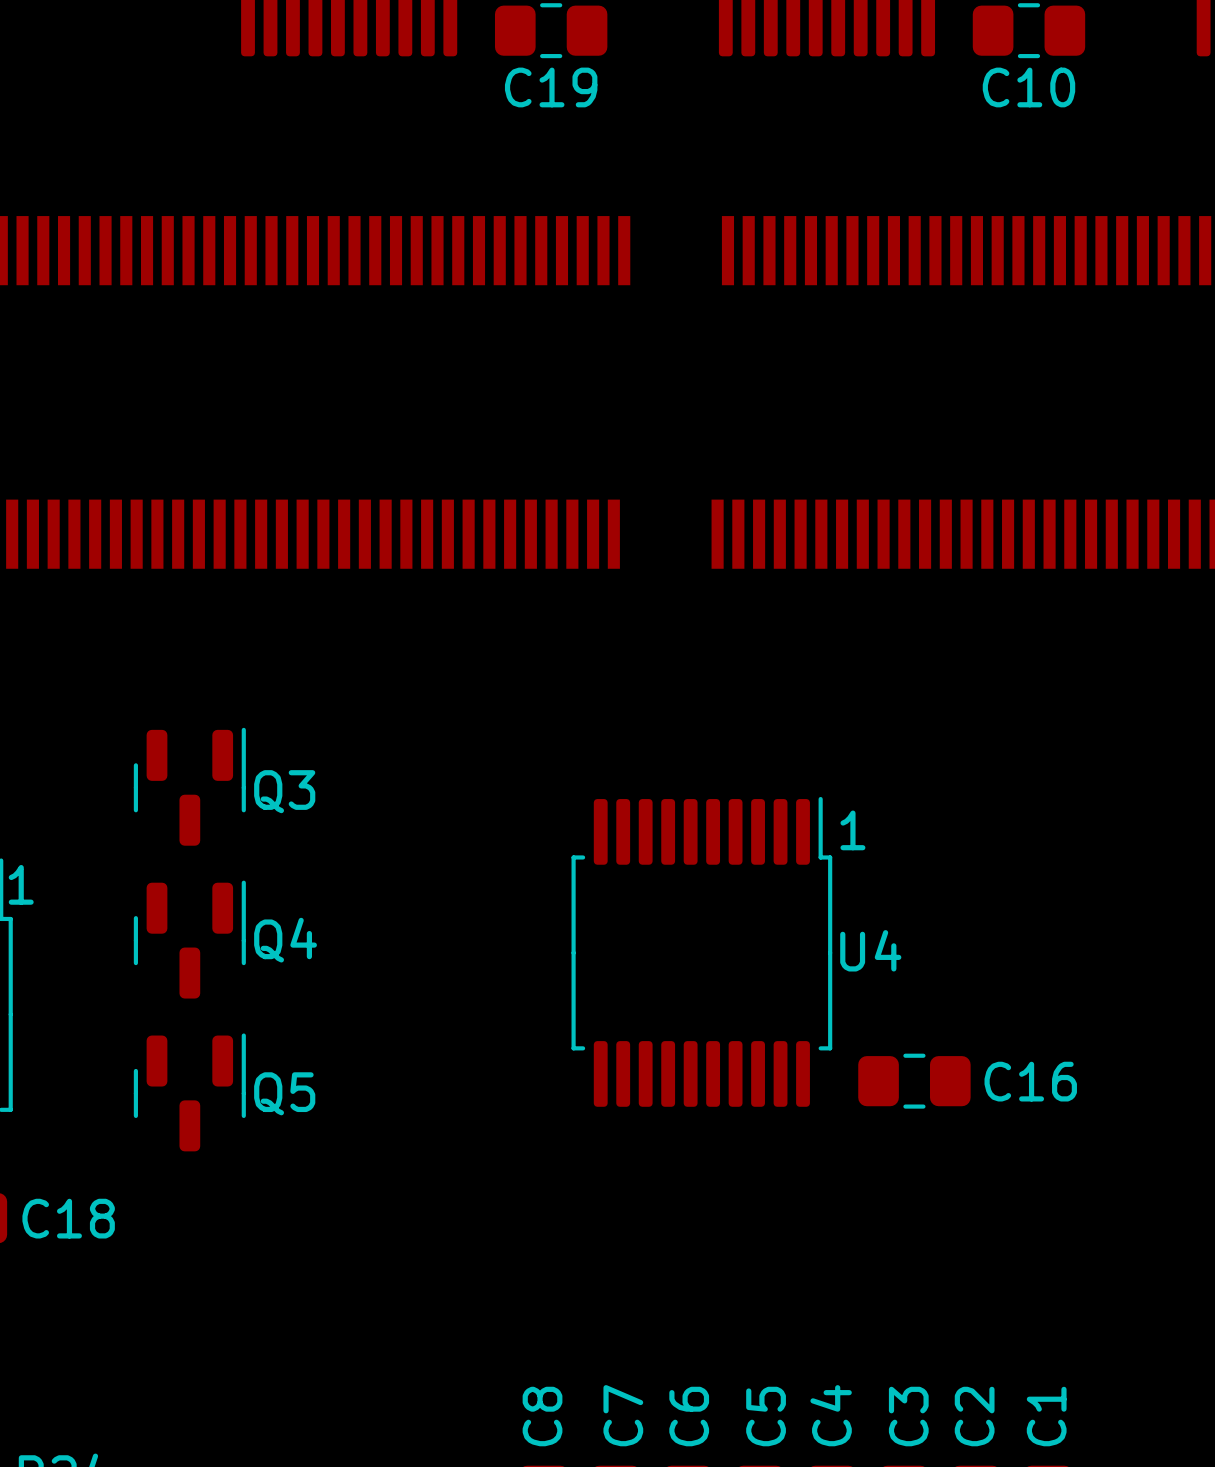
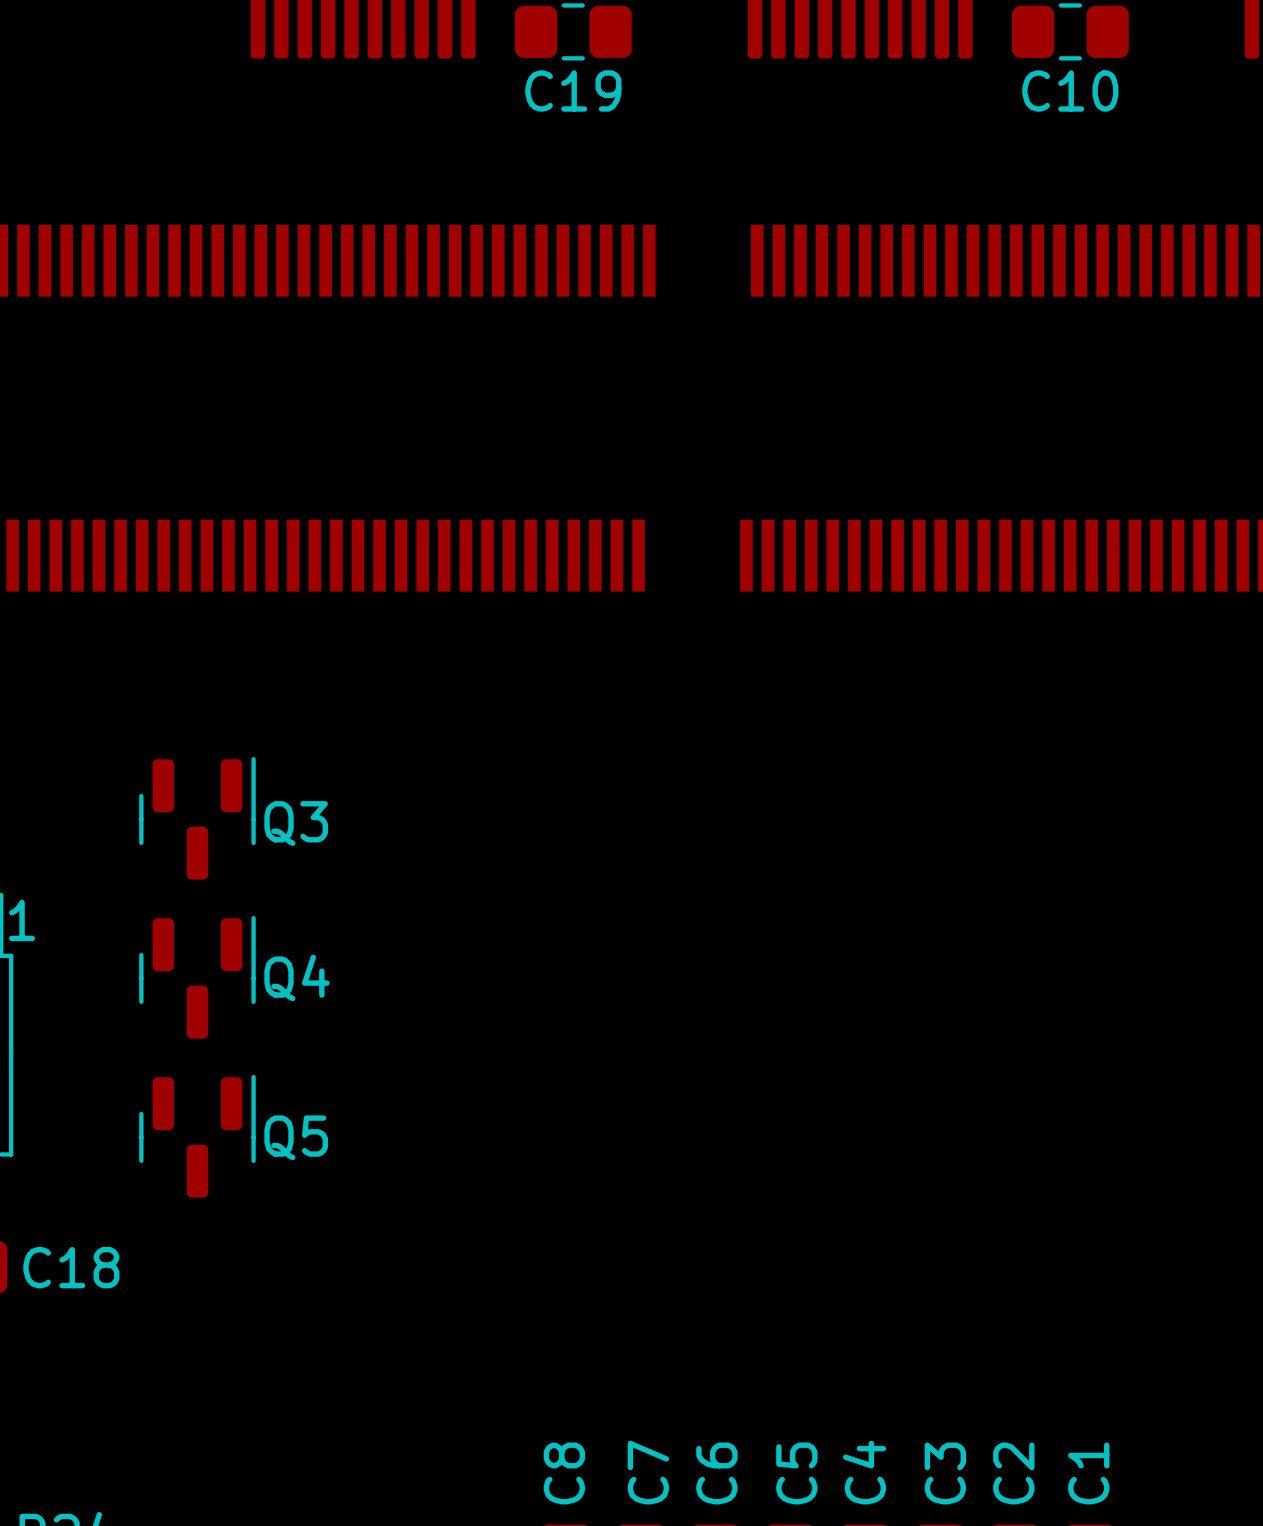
text: 1 (852, 830) -> none
U4: (701, 951) -> none
C16: (914, 1081) -> none

